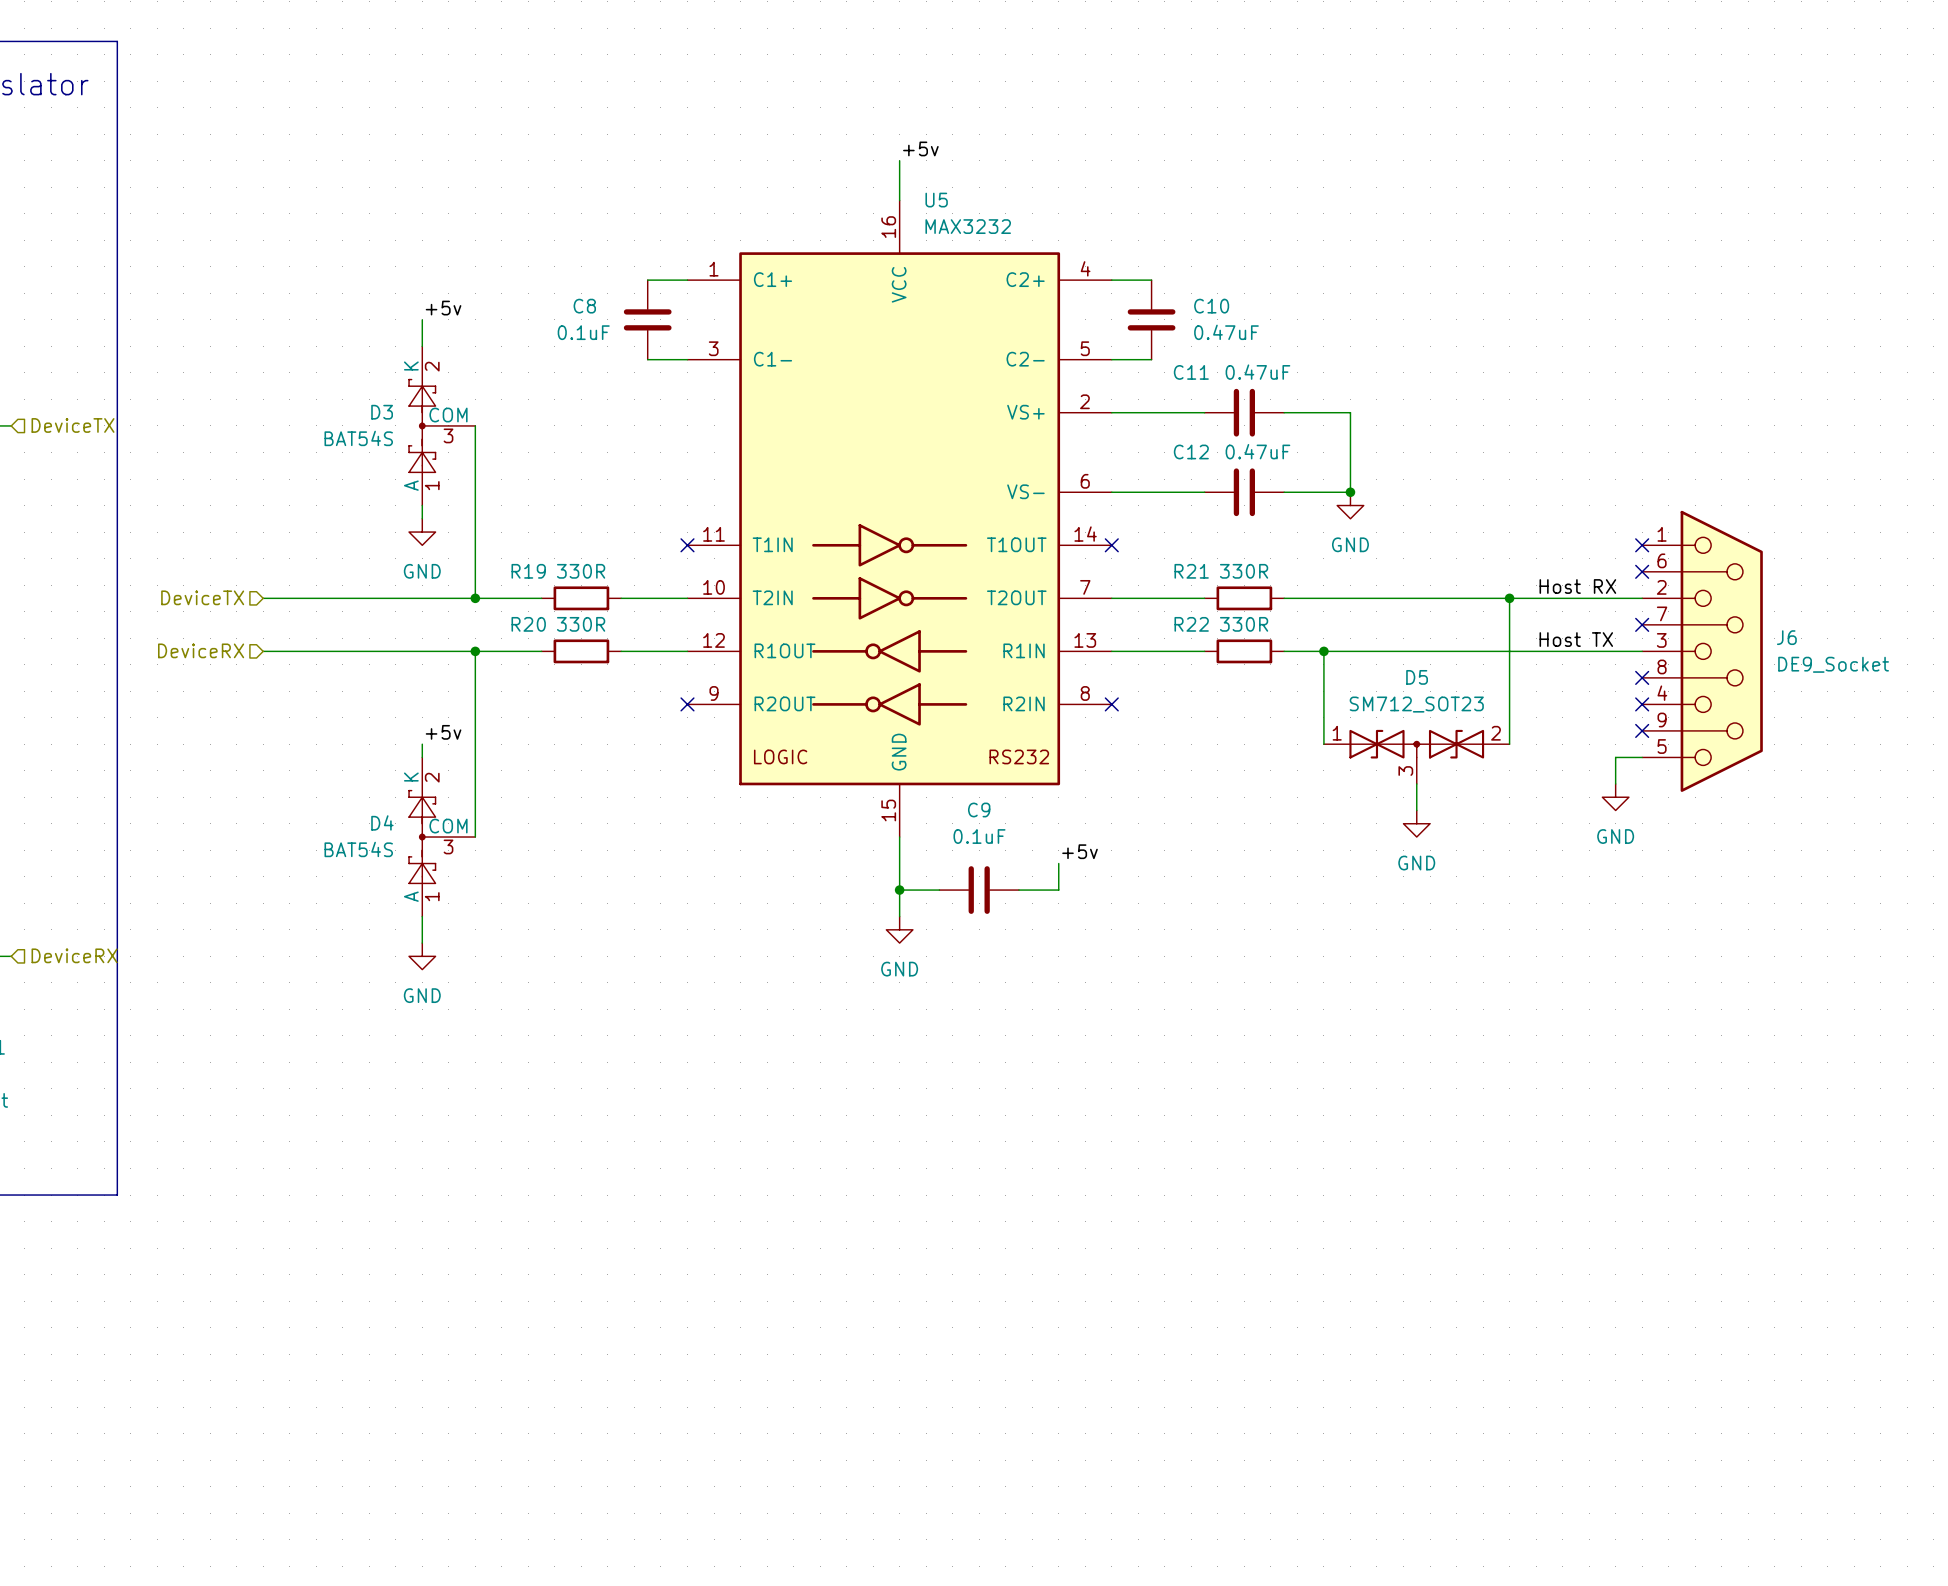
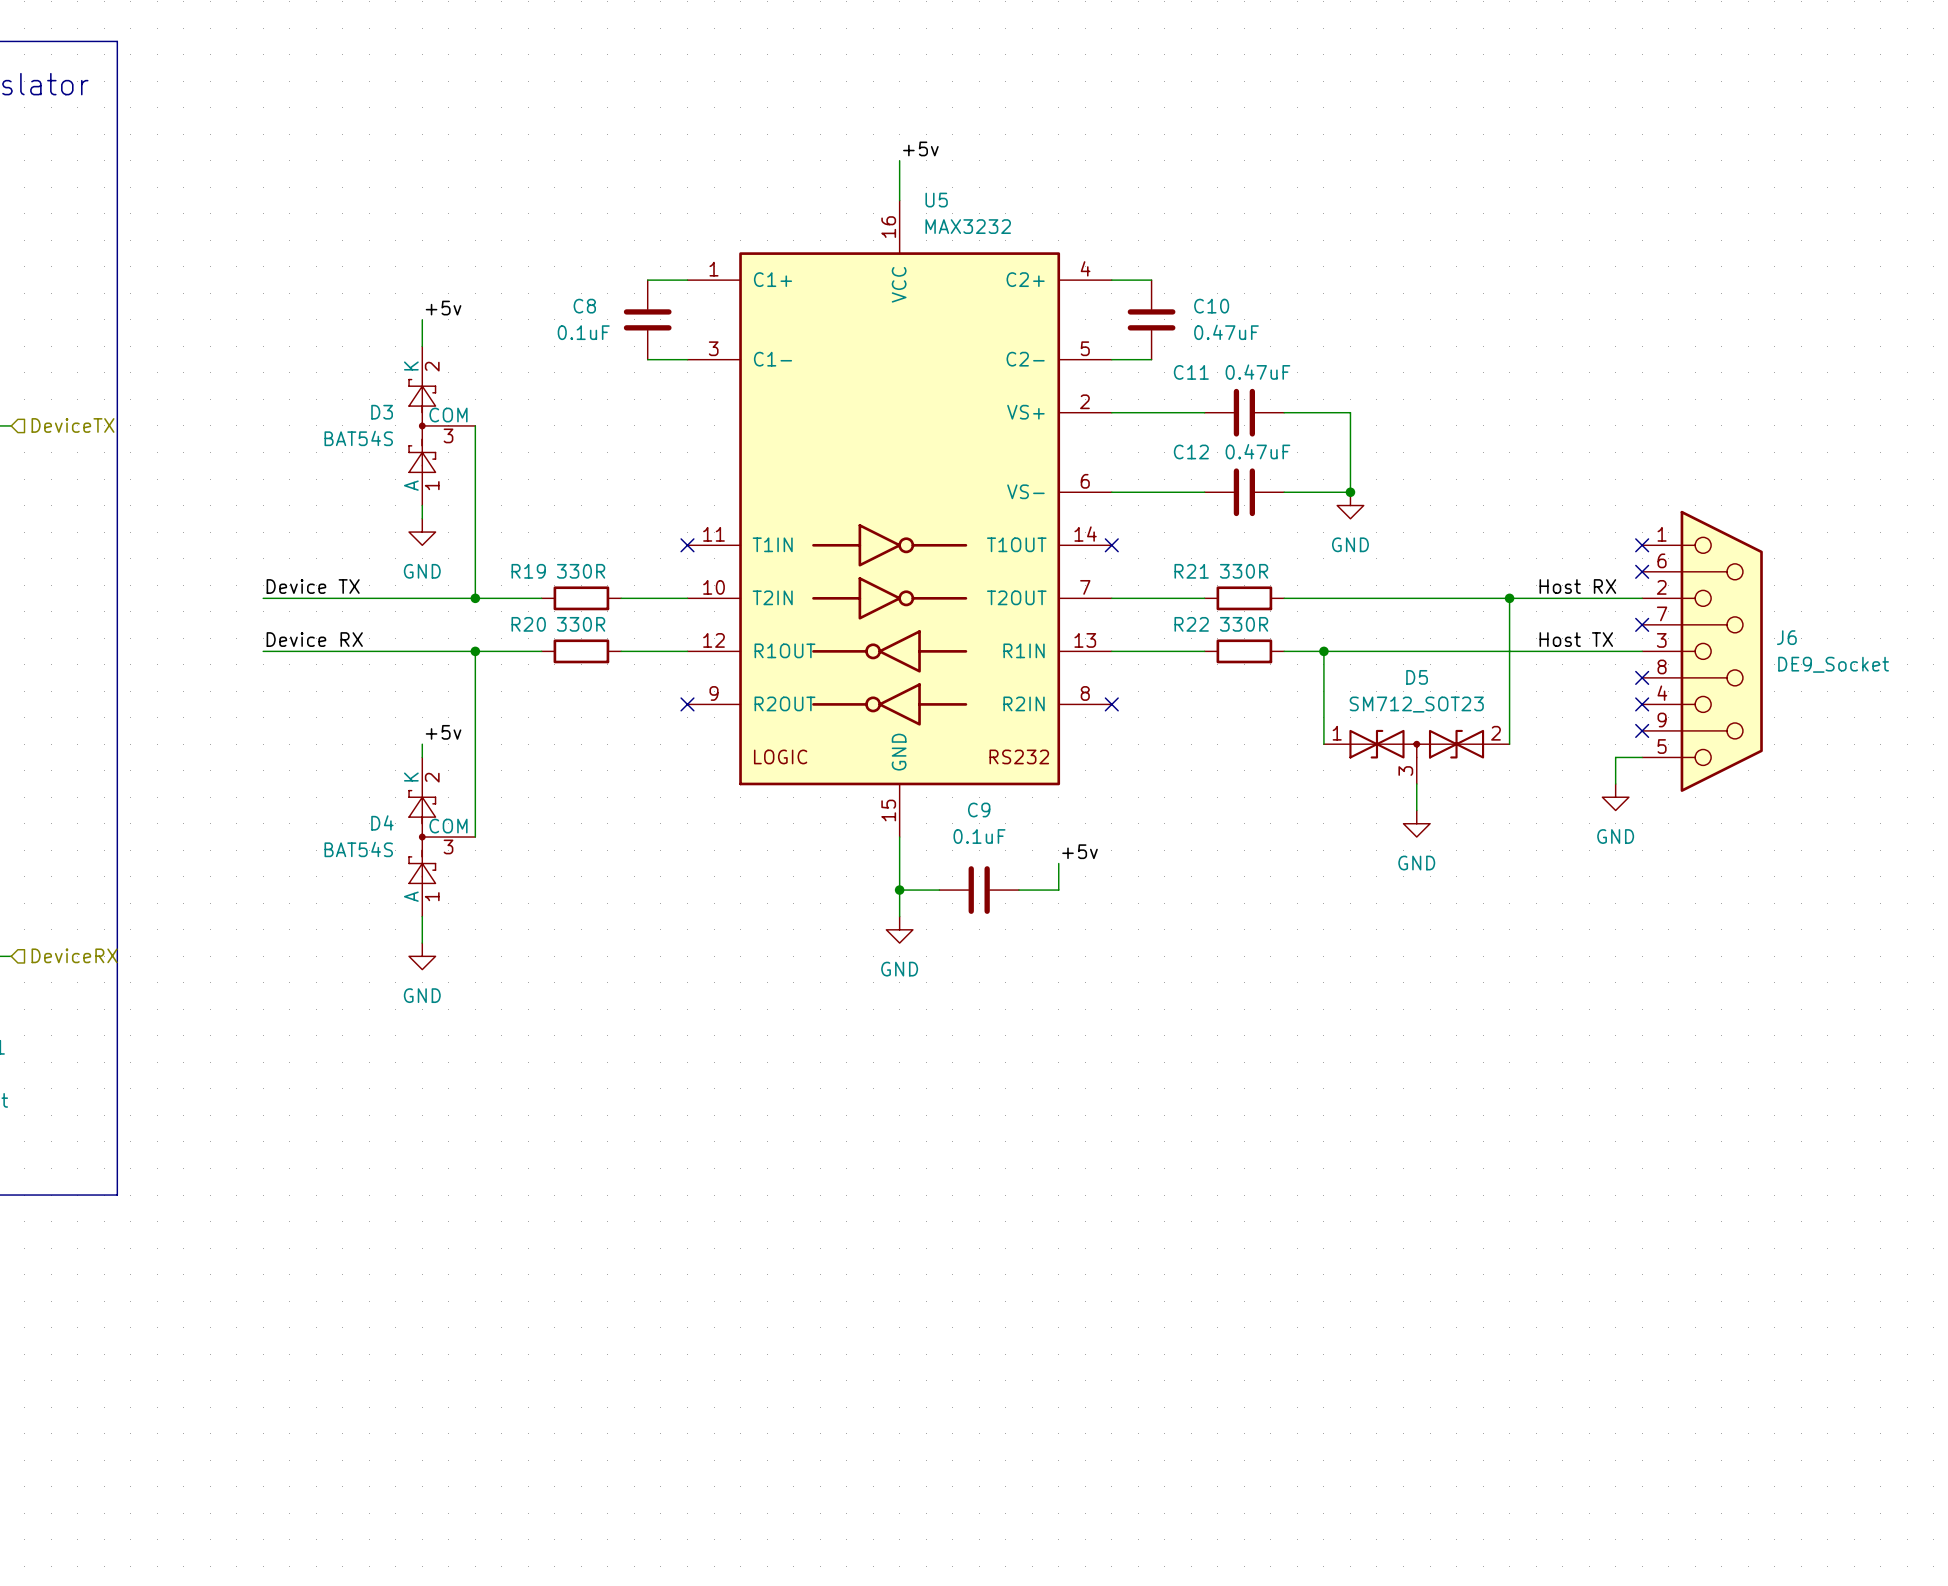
label: none -> Device TX (313, 586)
hierarchical label: DeviceTX (202, 597) -> none
label: none -> Device RX (314, 639)
hierarchical label: DeviceRX (201, 650) -> none

